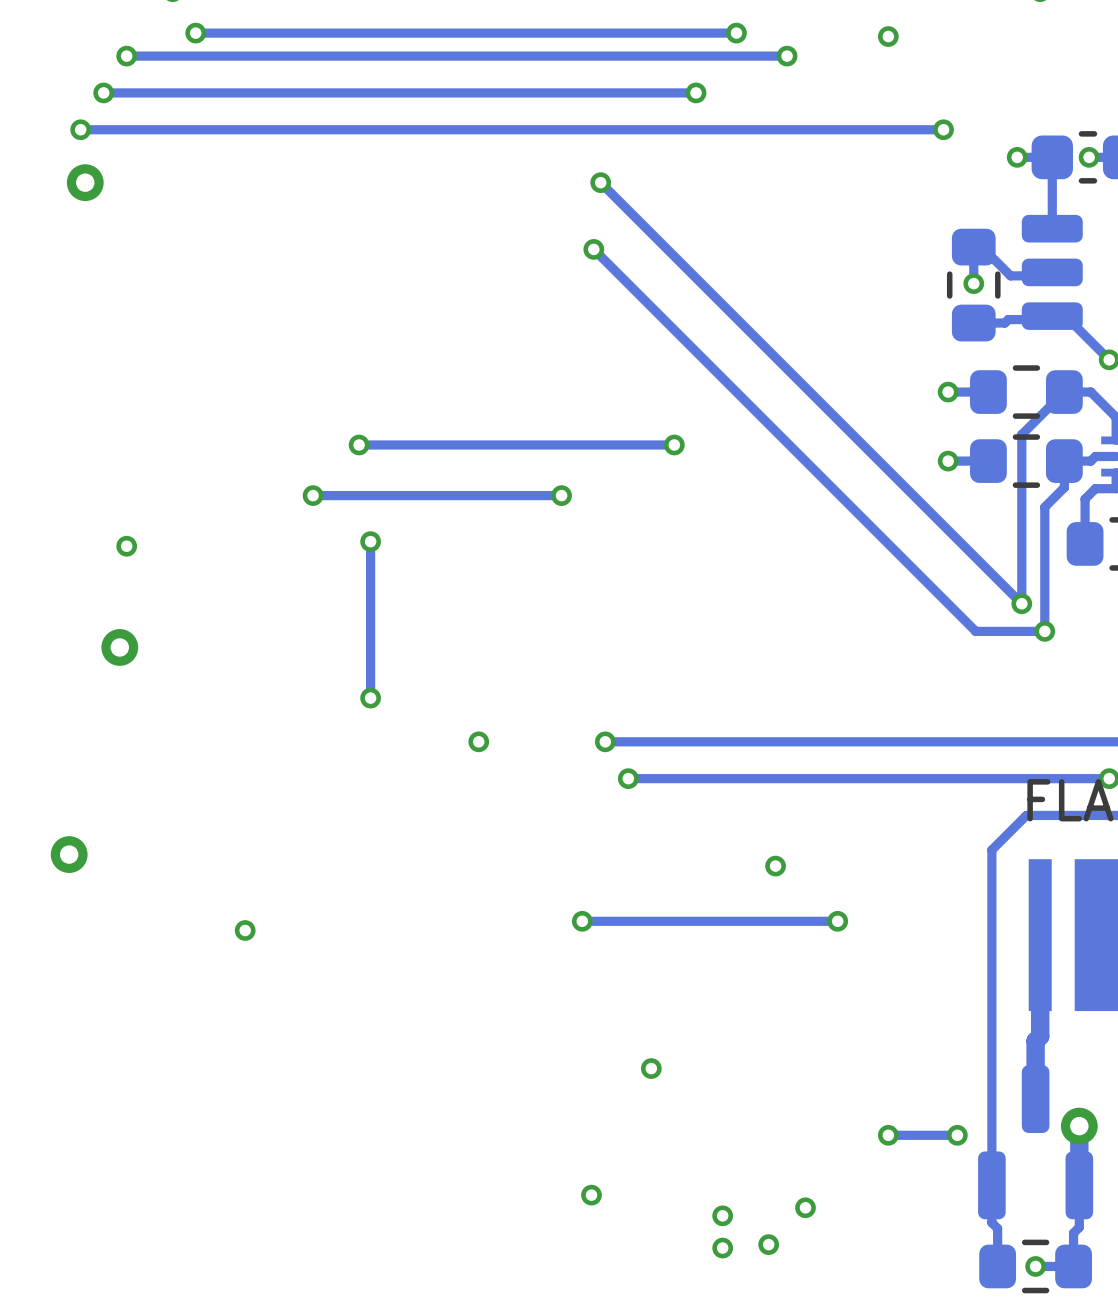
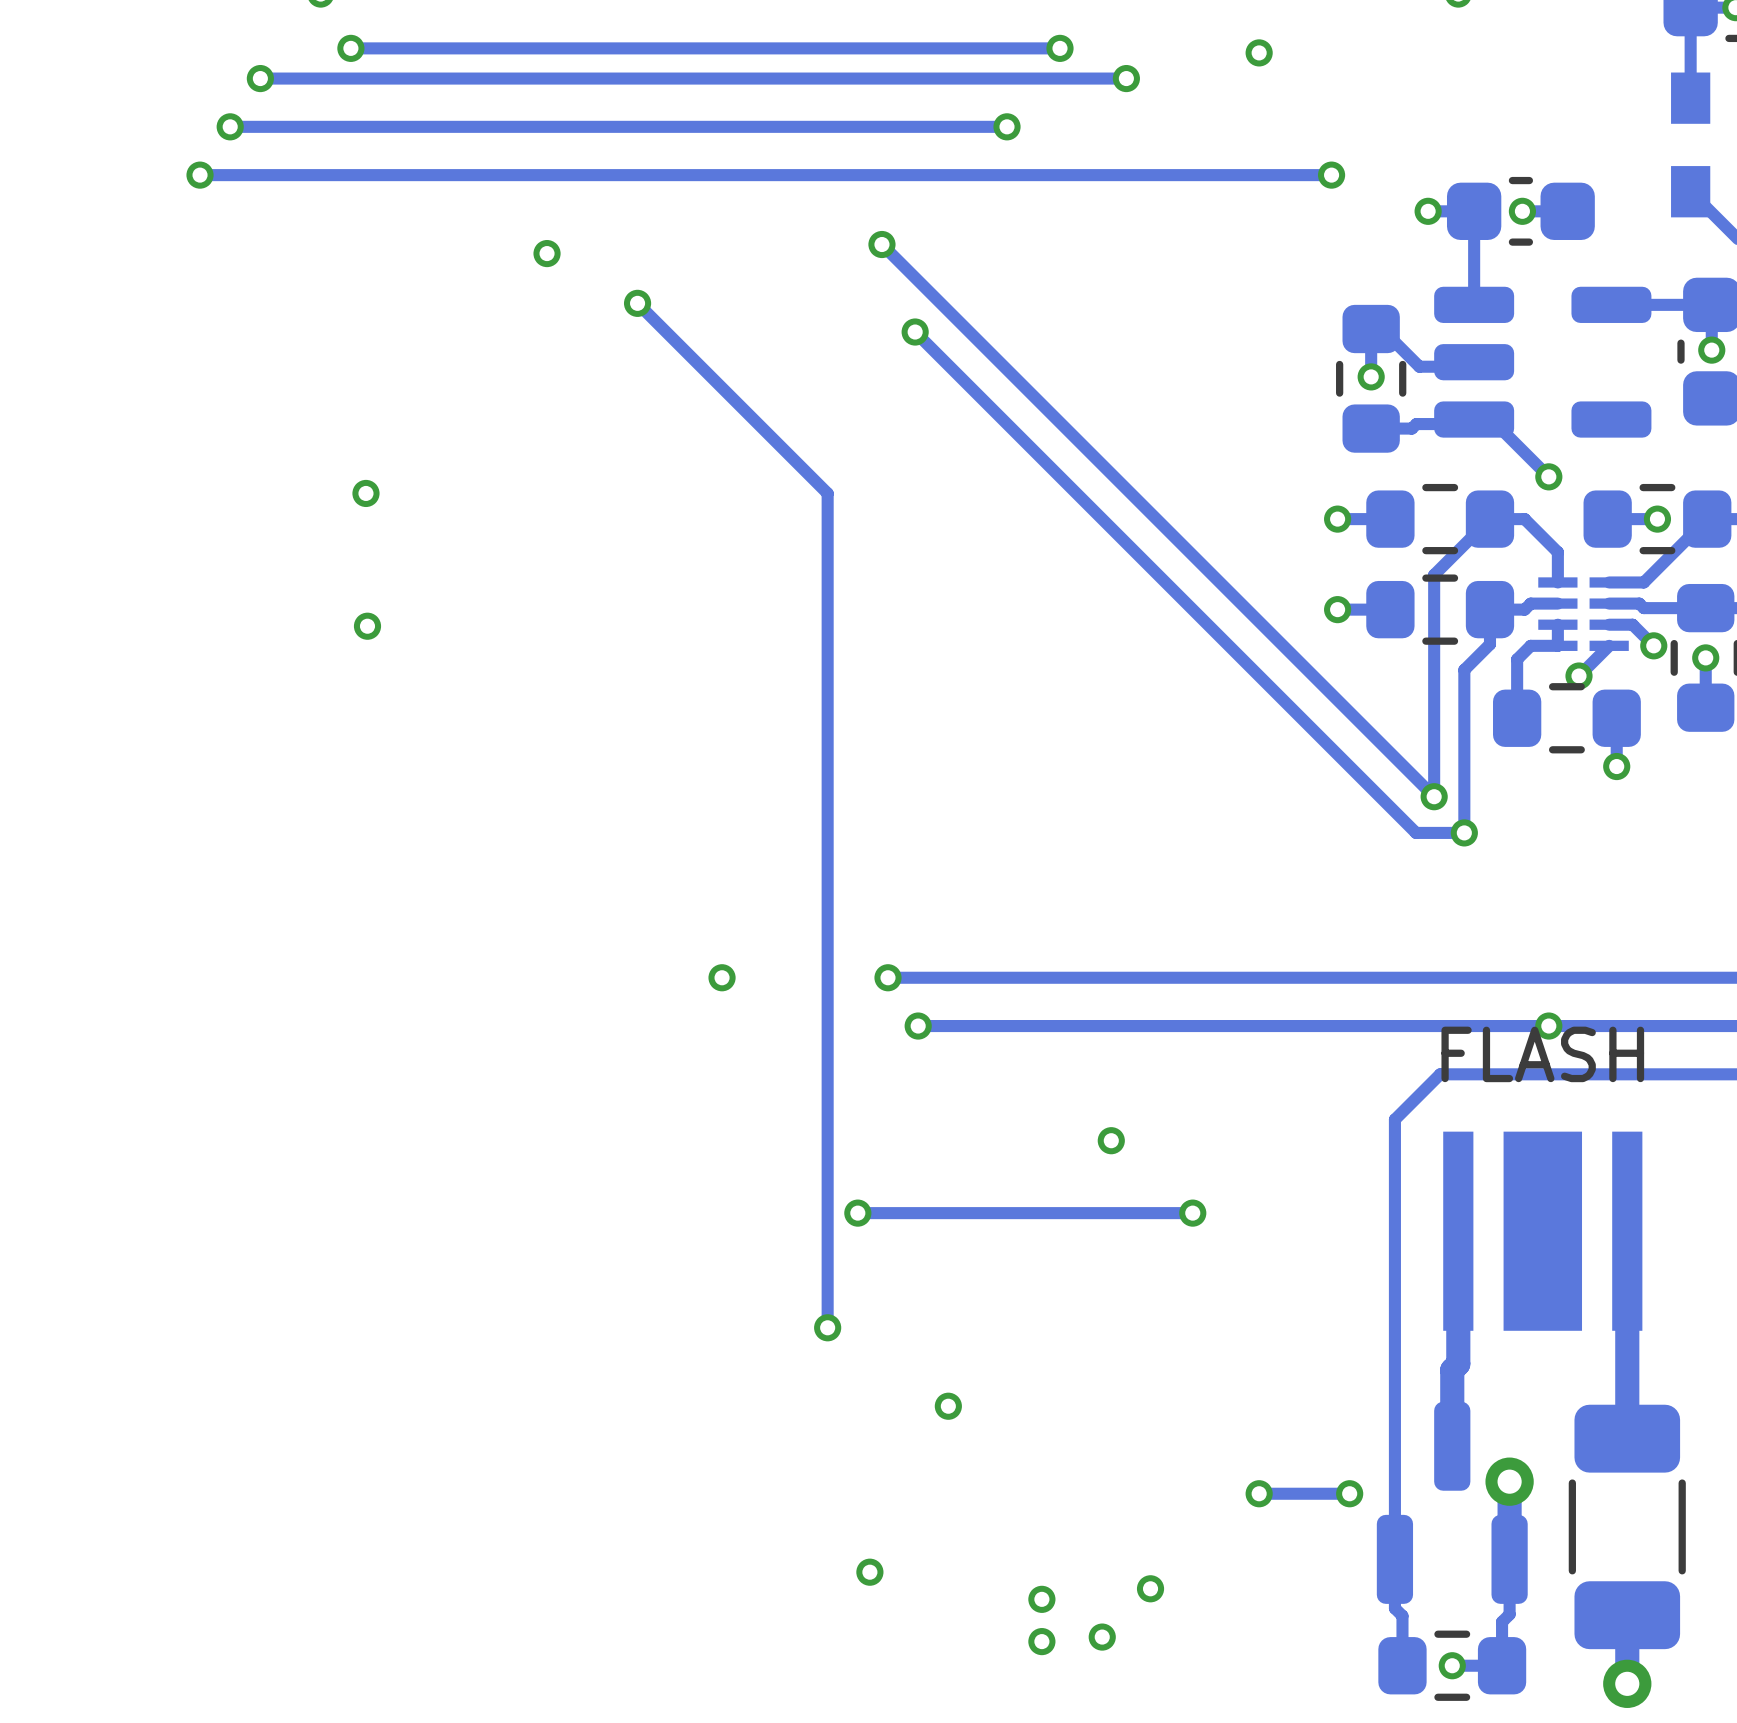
via: (85, 182) -> none
via: none -> (547, 253)
track: none -> (637, 303) (827, 493) (827, 1327)
via: none -> (637, 303)
track: (593, 249) (975, 631) (1007, 631) -> (915, 332) (1416, 832)
via position: (593, 249) -> (915, 332)
via: none -> (365, 493)
via: (359, 444) -> none
track: (674, 444) (359, 444) -> none
via: (674, 444) -> none
via: none -> (367, 626)
via: (313, 495) -> none
track: (561, 495) (313, 495) -> none
via: (561, 495) -> none
track: (370, 541) (370, 698) -> none
via: (370, 541) -> none
via: (126, 546) -> none
via: (119, 647) -> none
via: (370, 698) -> none
via: (69, 854) -> none
via: (245, 930) -> none
via: none -> (827, 1327)

